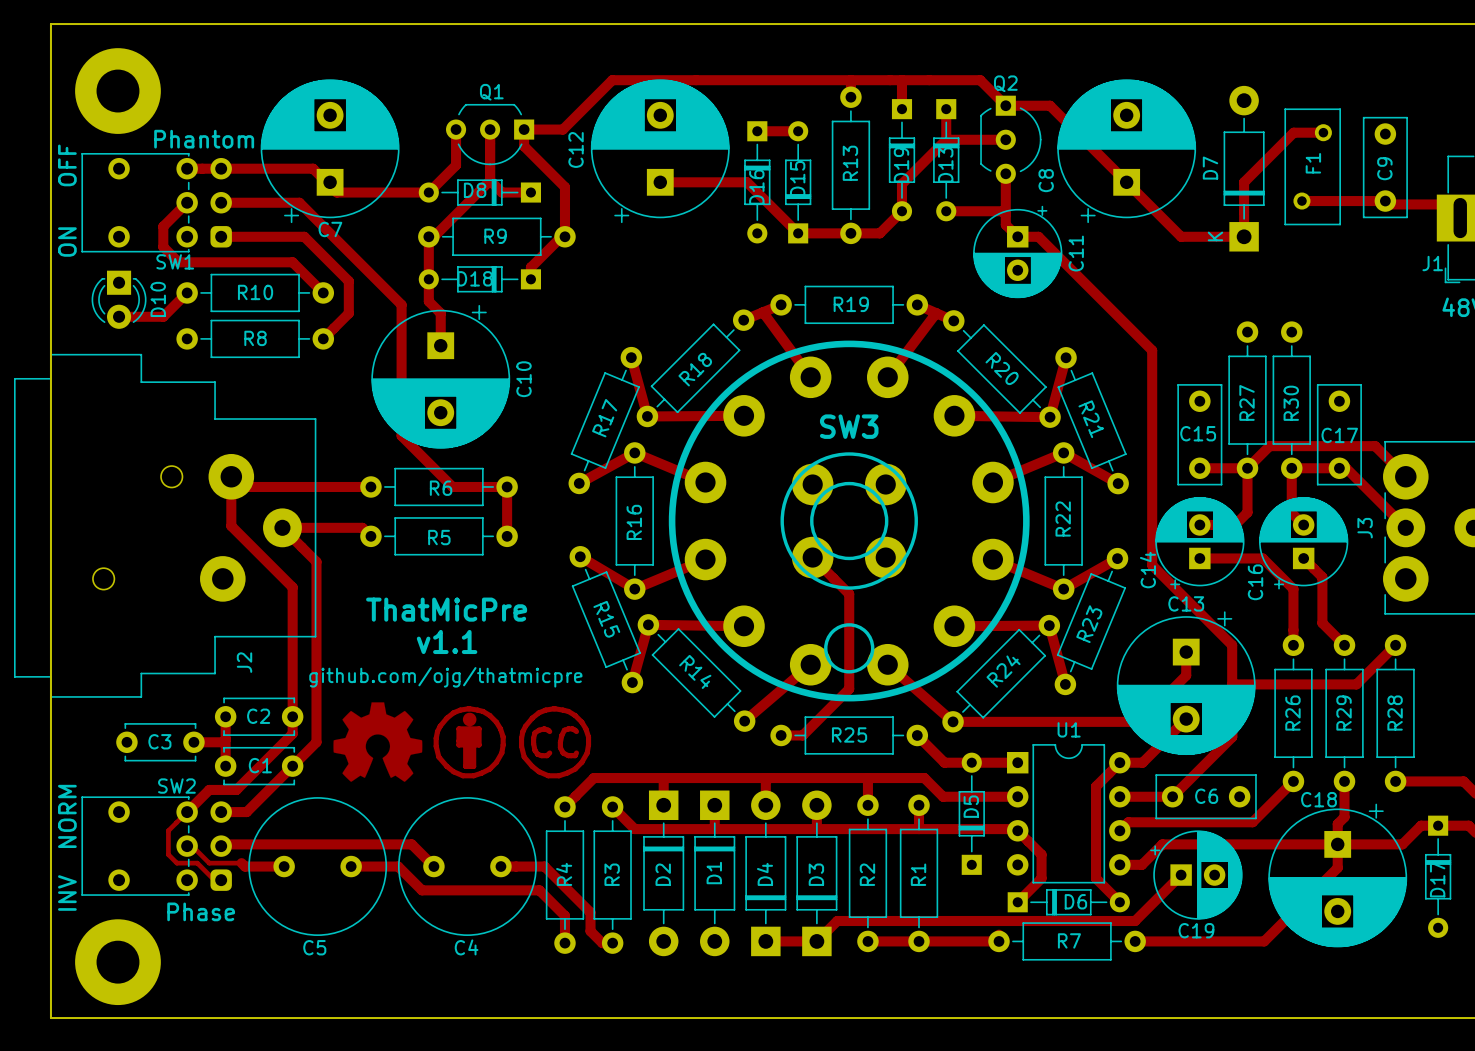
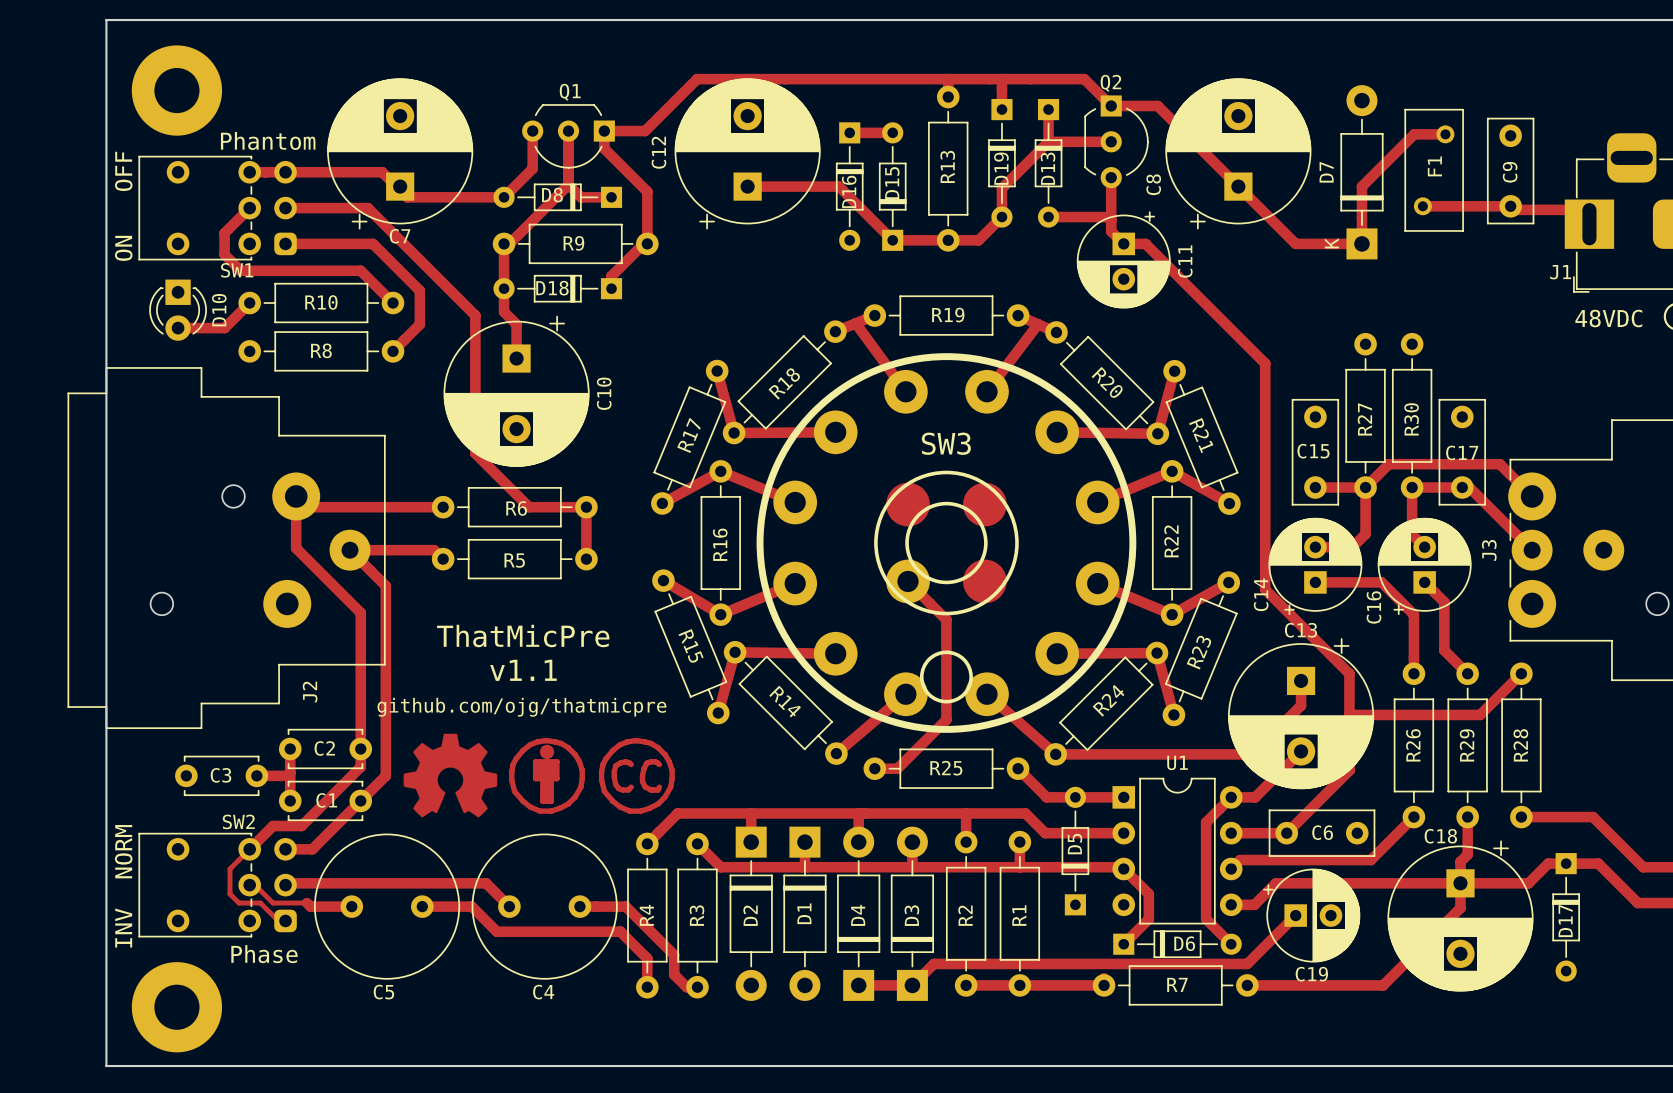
SW3 footprint: [668, 340, 1030, 702] -> [756, 353, 1137, 733]

